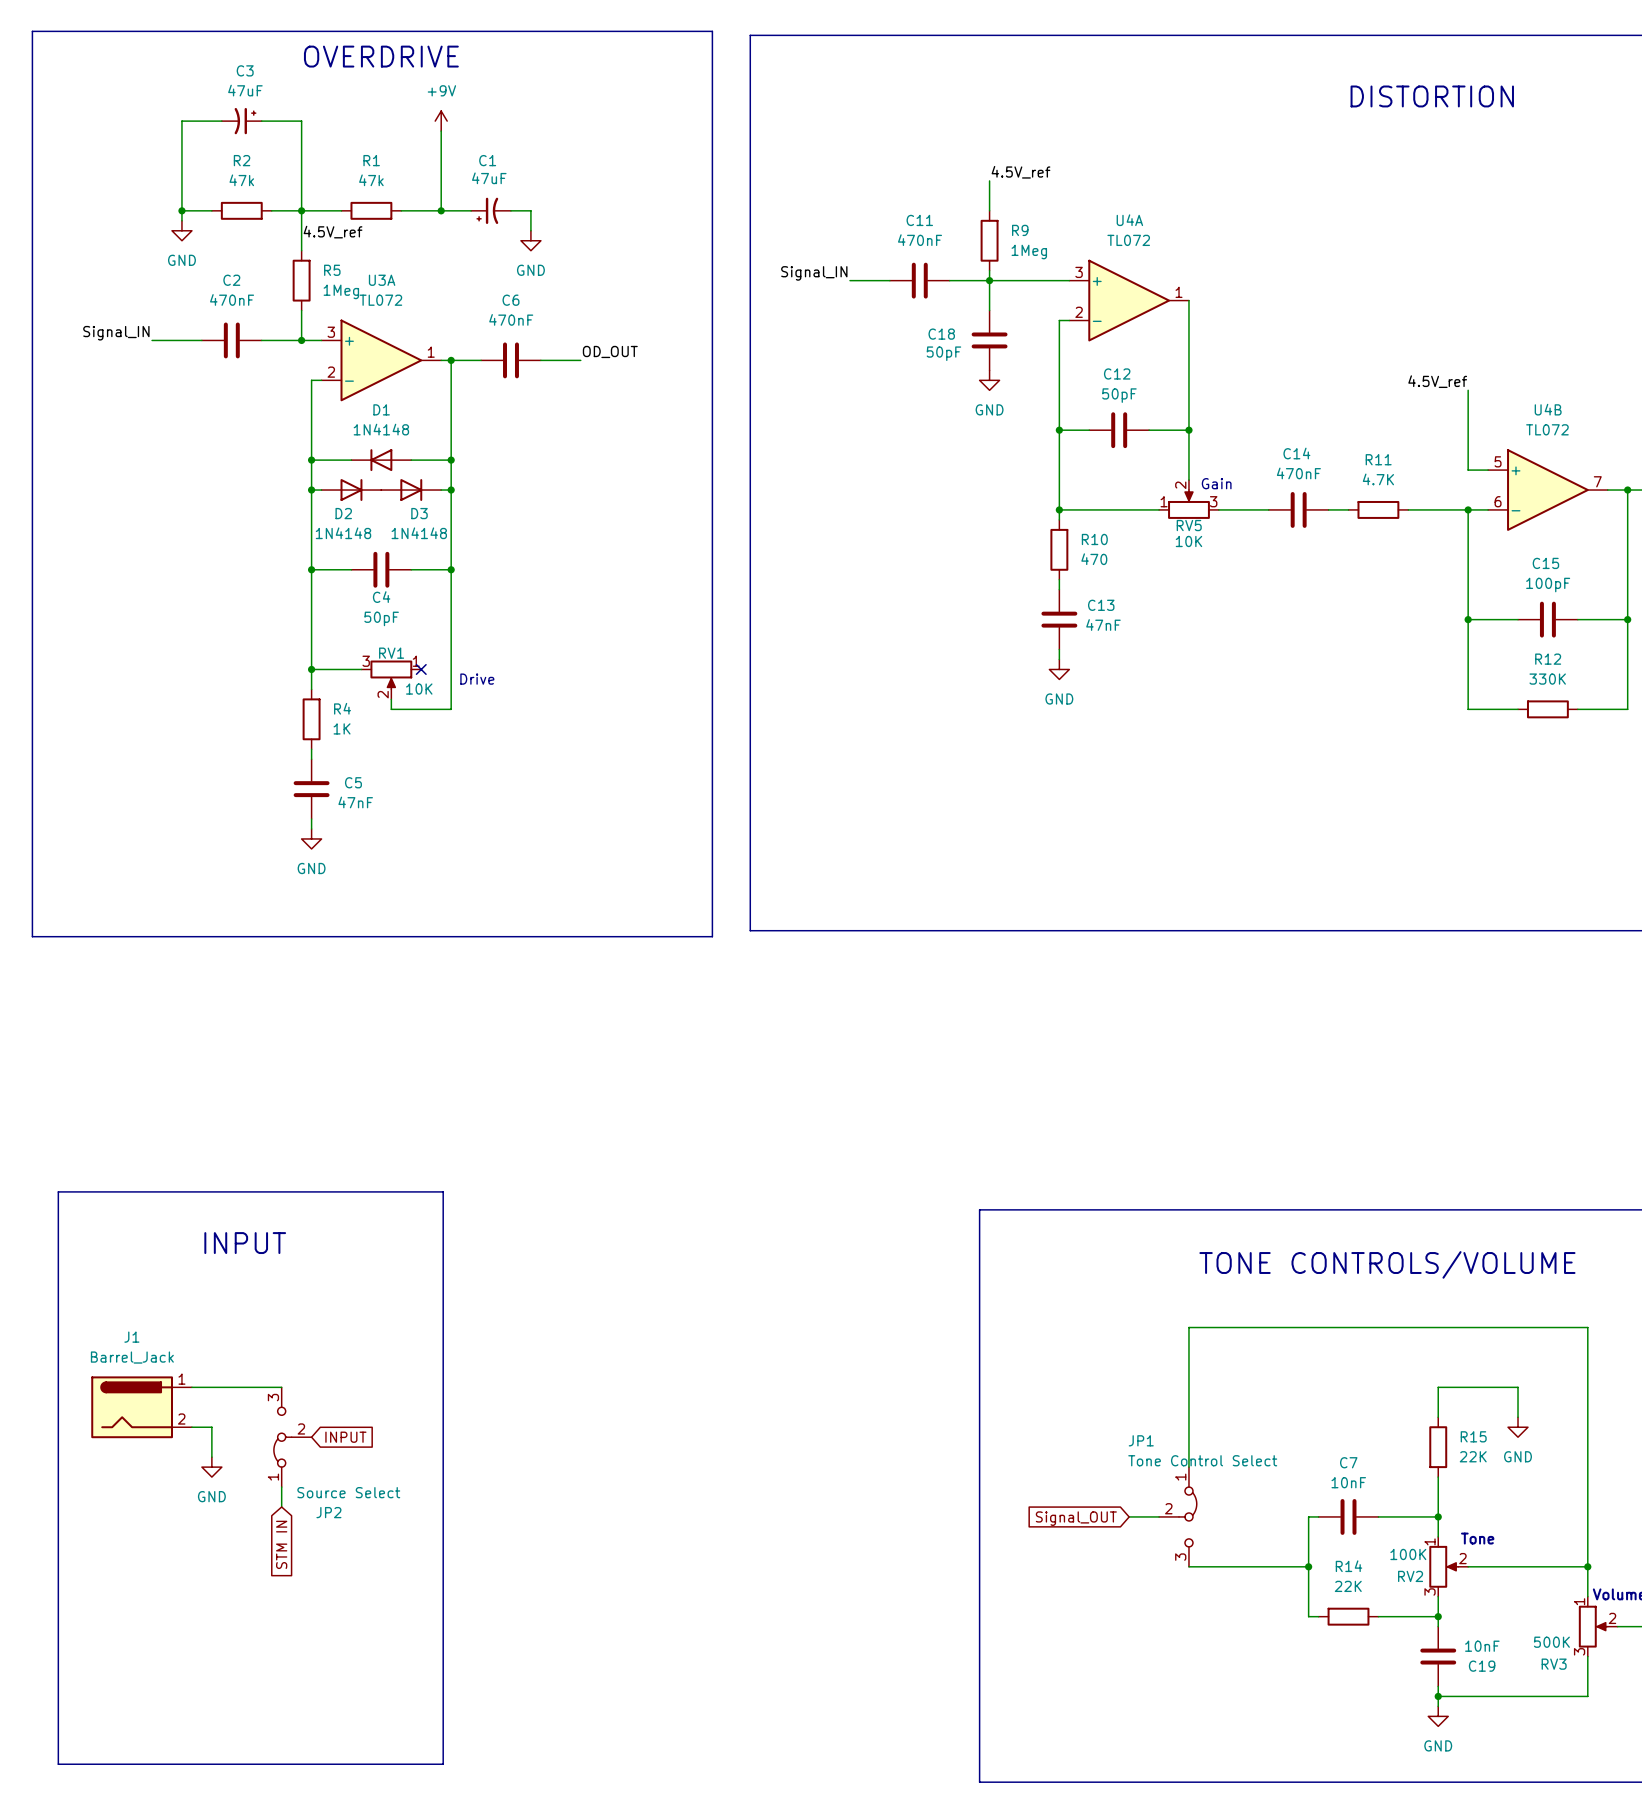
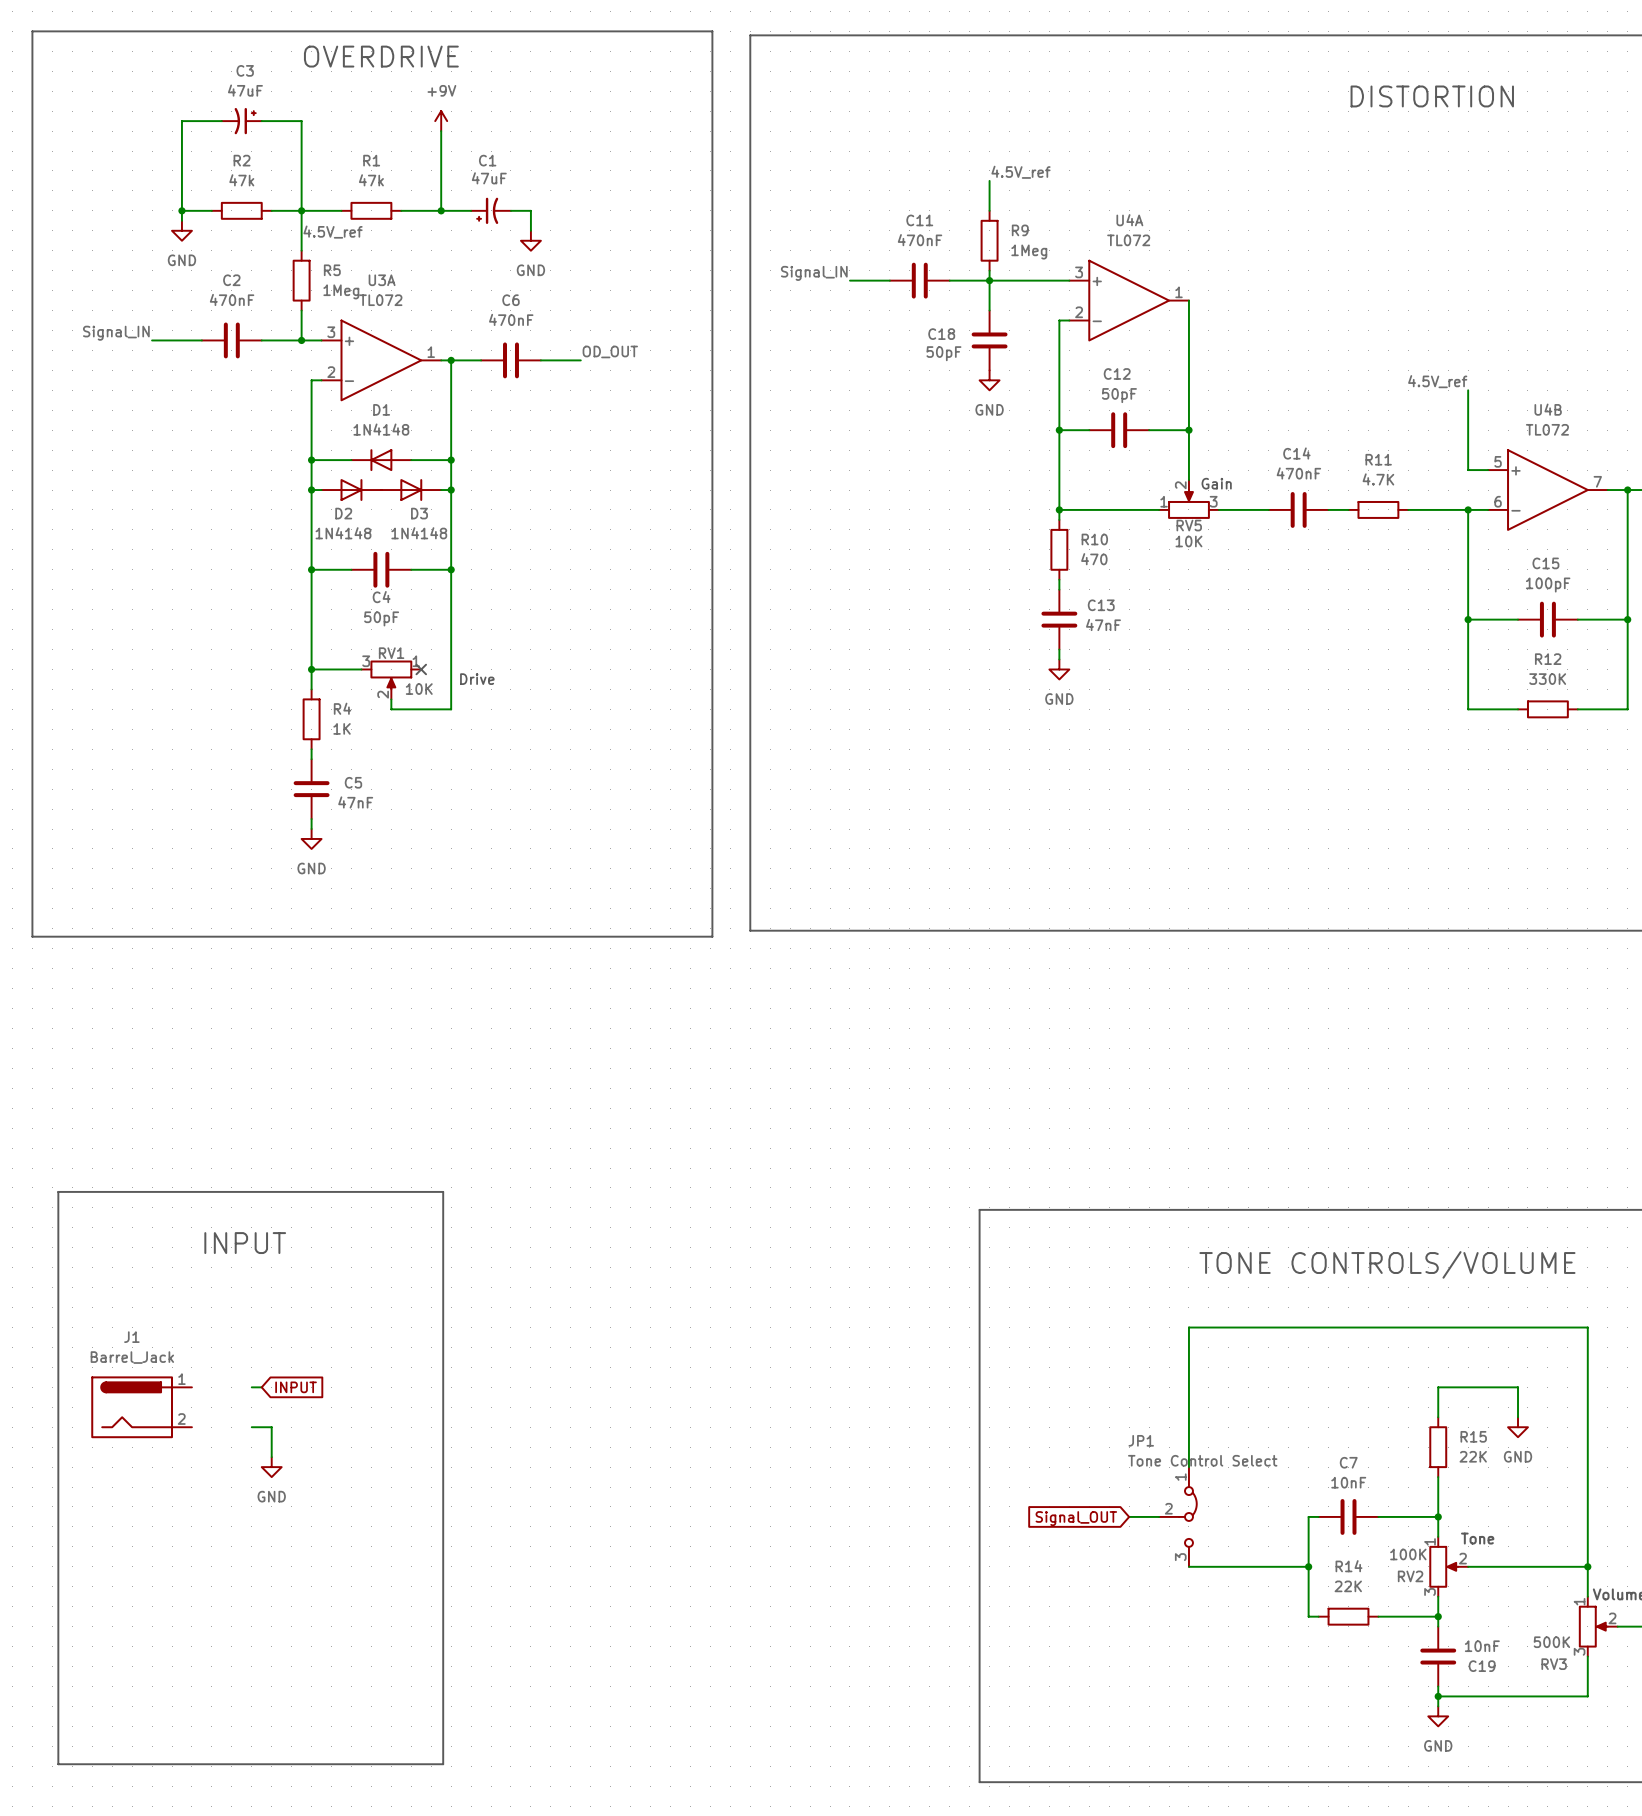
wire: (191, 1387) (251, 1387) -> none
wire: (261, 1387) (281, 1387) -> none
wire: (191, 1427) (211, 1427) (211, 1457) -> (251, 1427) (271, 1427) (271, 1457)
JP2: Source Select (292, 1437) -> none
global label position: INPUT (345, 1437) -> INPUT (296, 1387)
power symbol position: GND (211, 1467) -> GND (271, 1467)
wire: (281, 1487) (281, 1506) -> none
global label: STM IN (281, 1544) -> none

